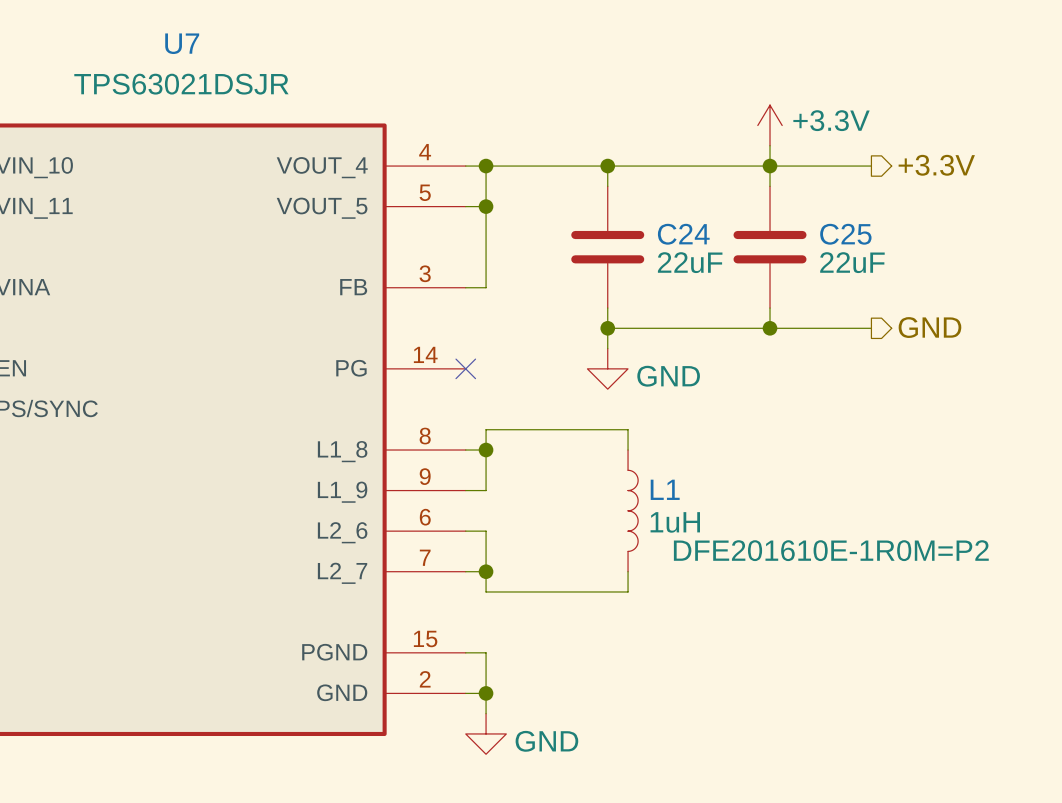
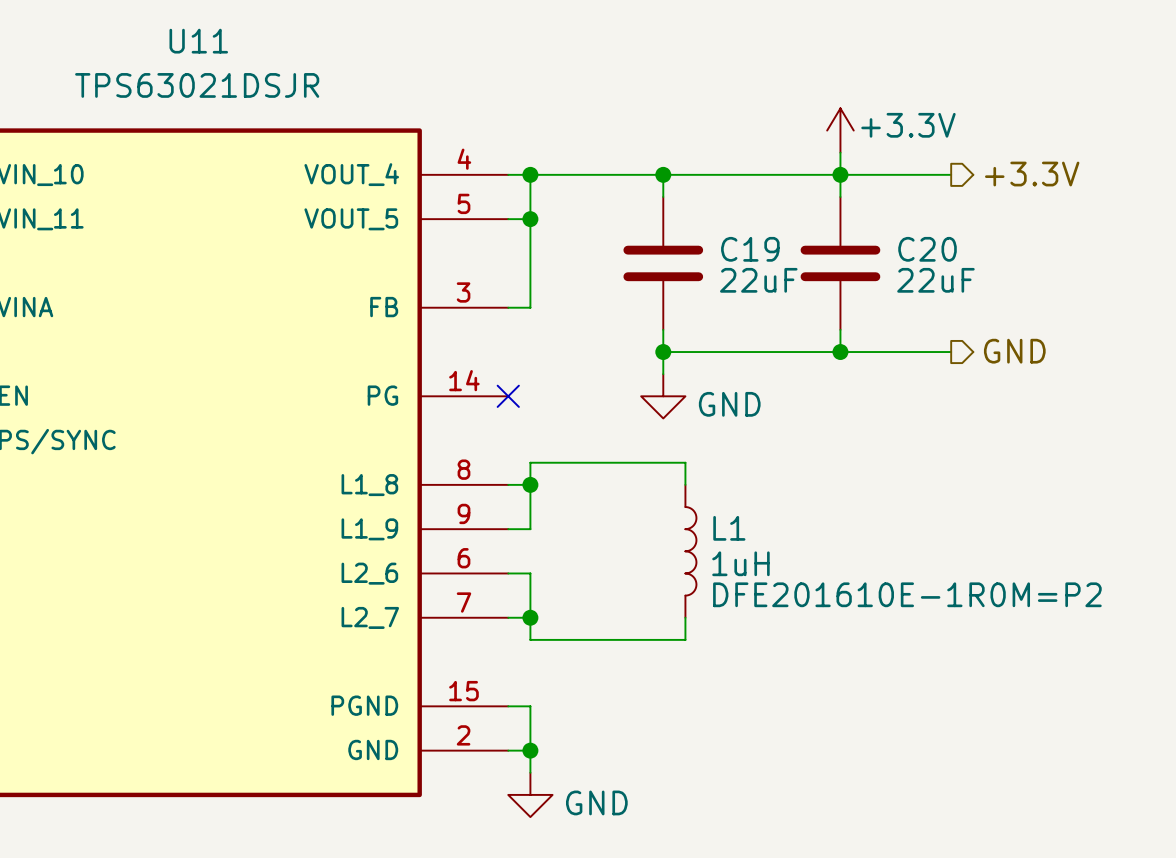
U7 name: U7 (182, 43) -> U11 (198, 41)
C24 name: C24 (683, 234) -> C19 (750, 249)
C25 name: C25 (845, 234) -> C20 (927, 249)

